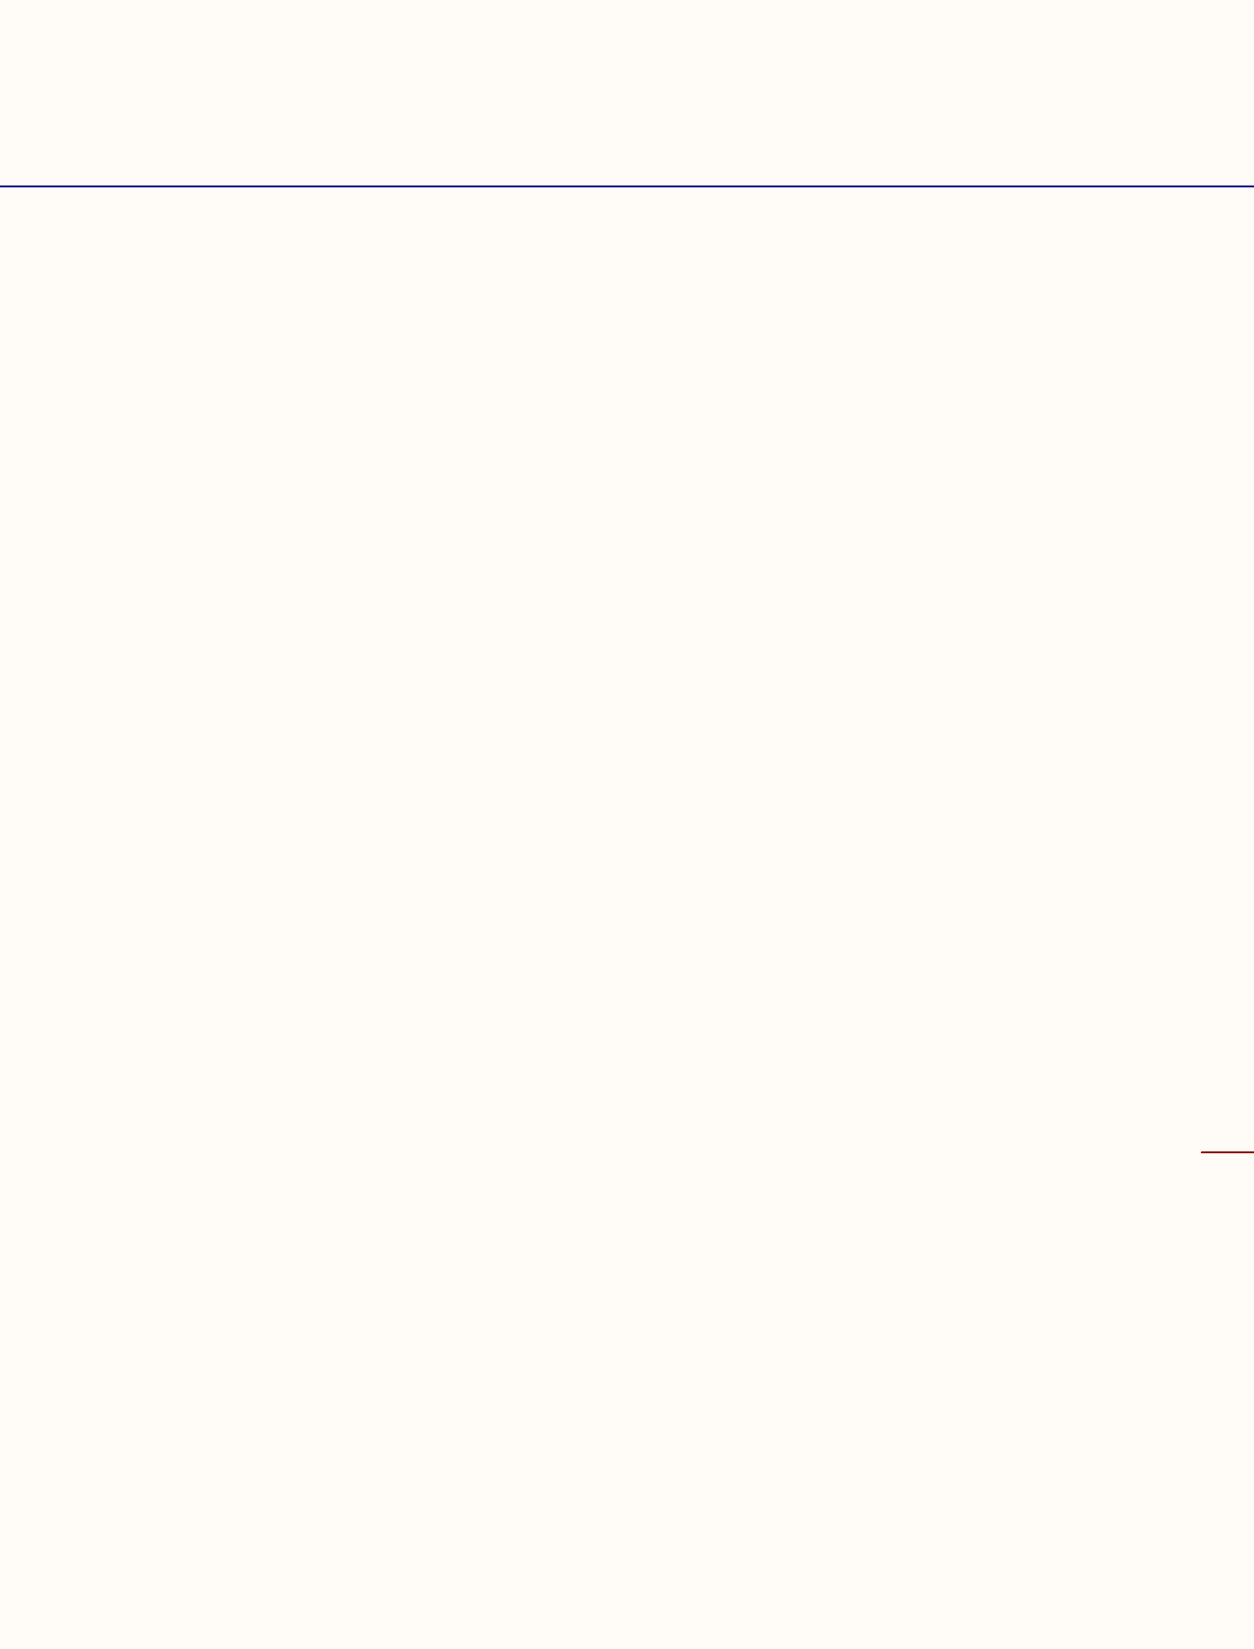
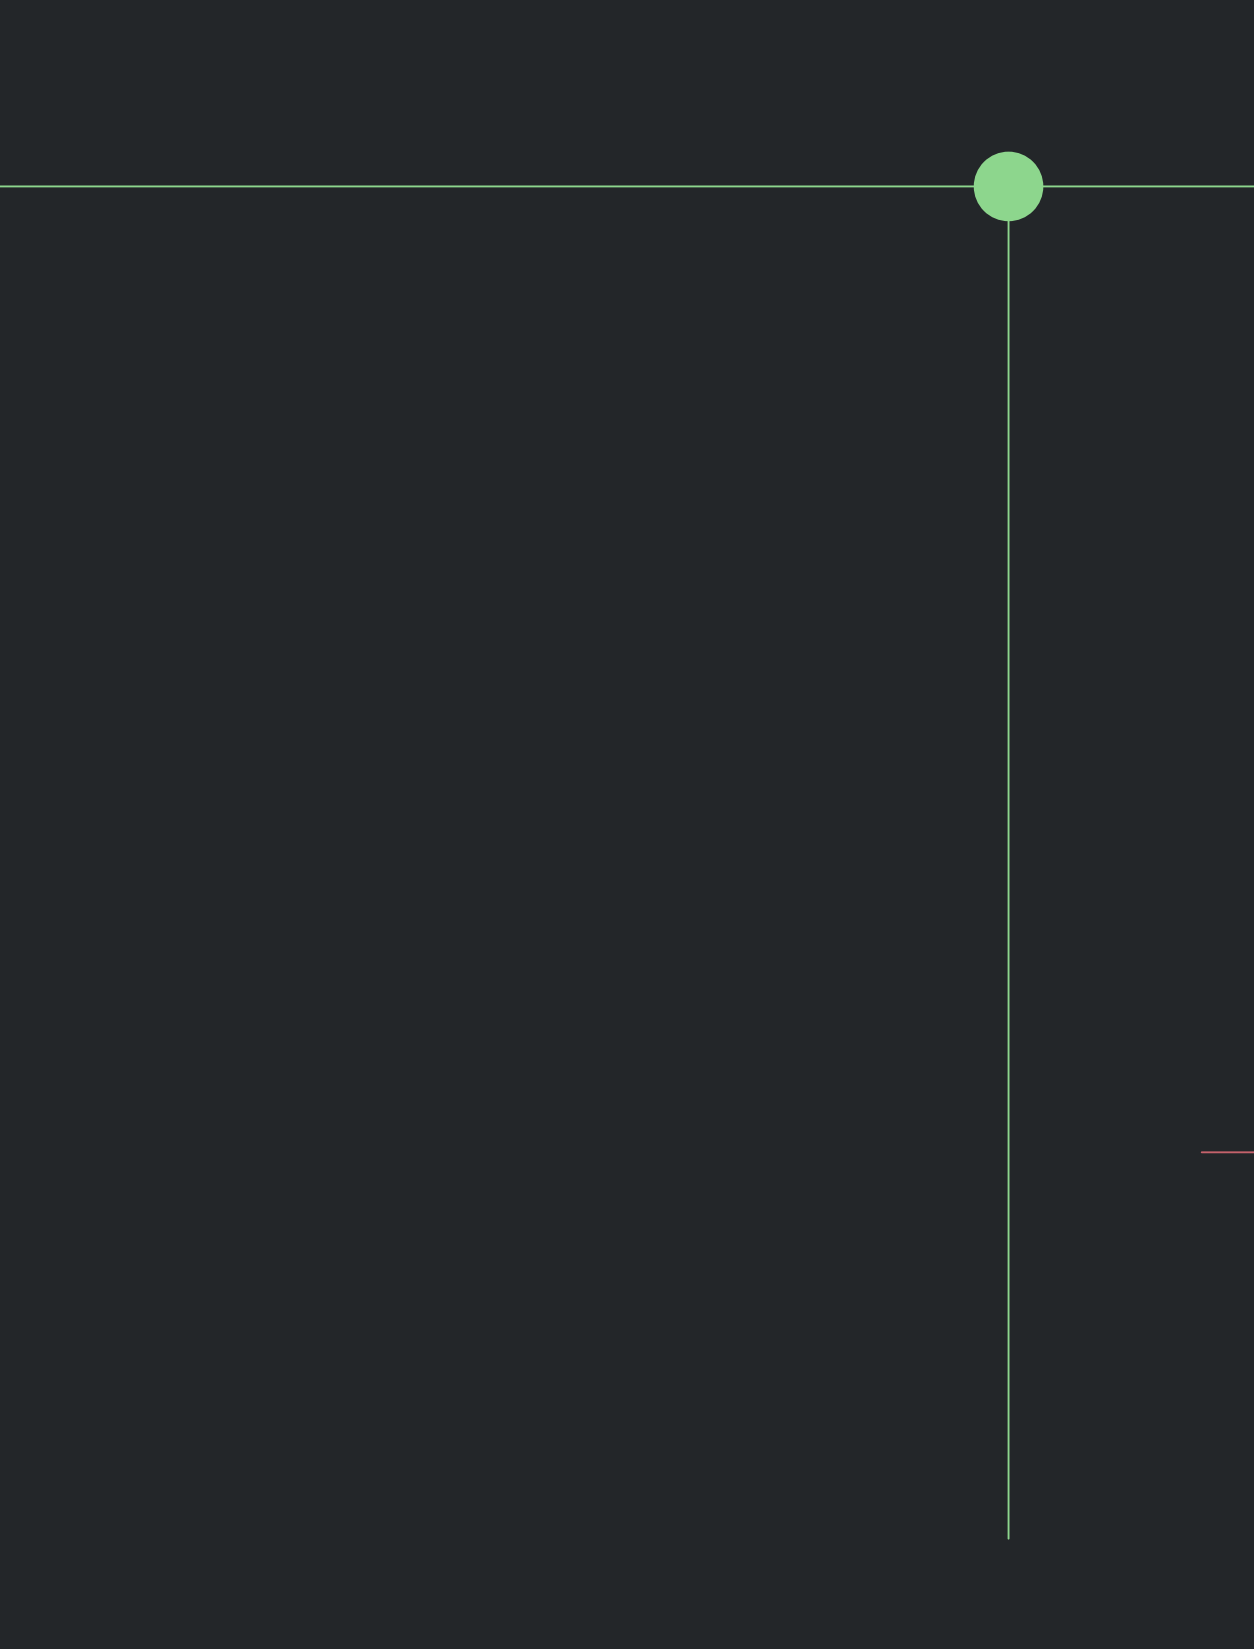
wire: none -> (1008, 186) (1008, 1538)
junction: none -> (1008, 186)

